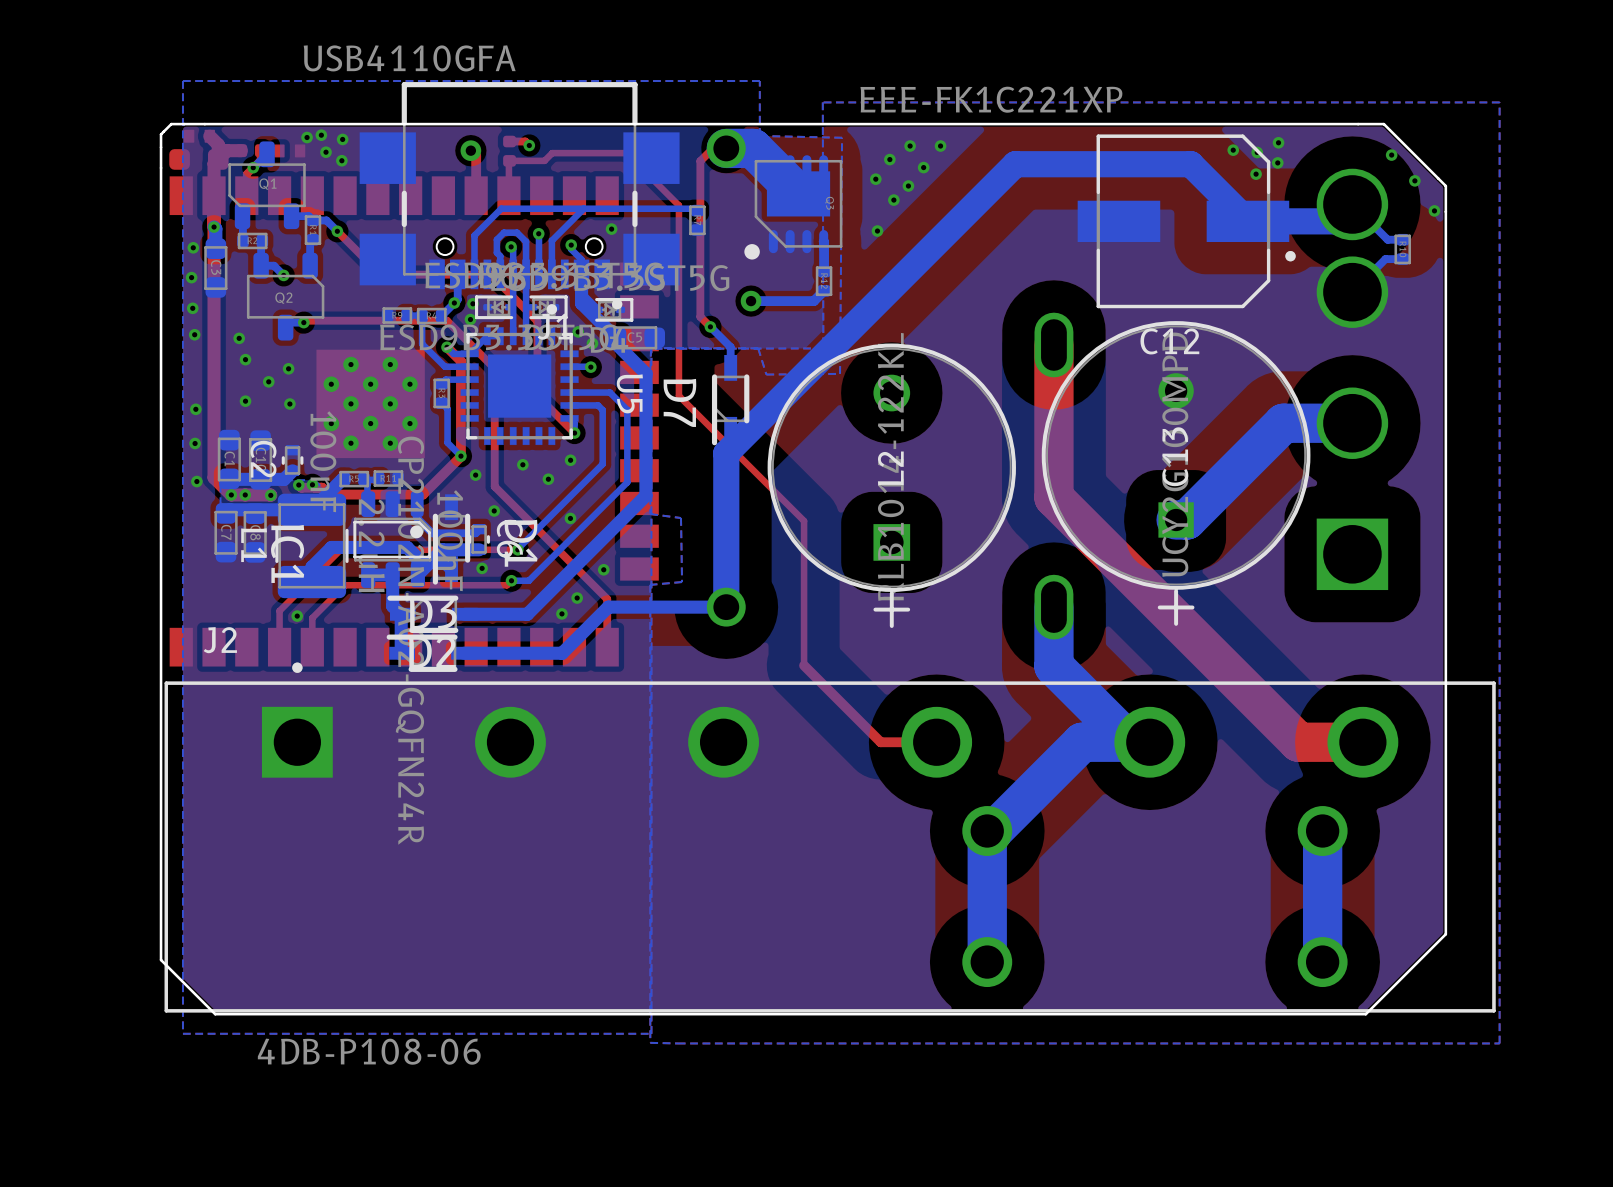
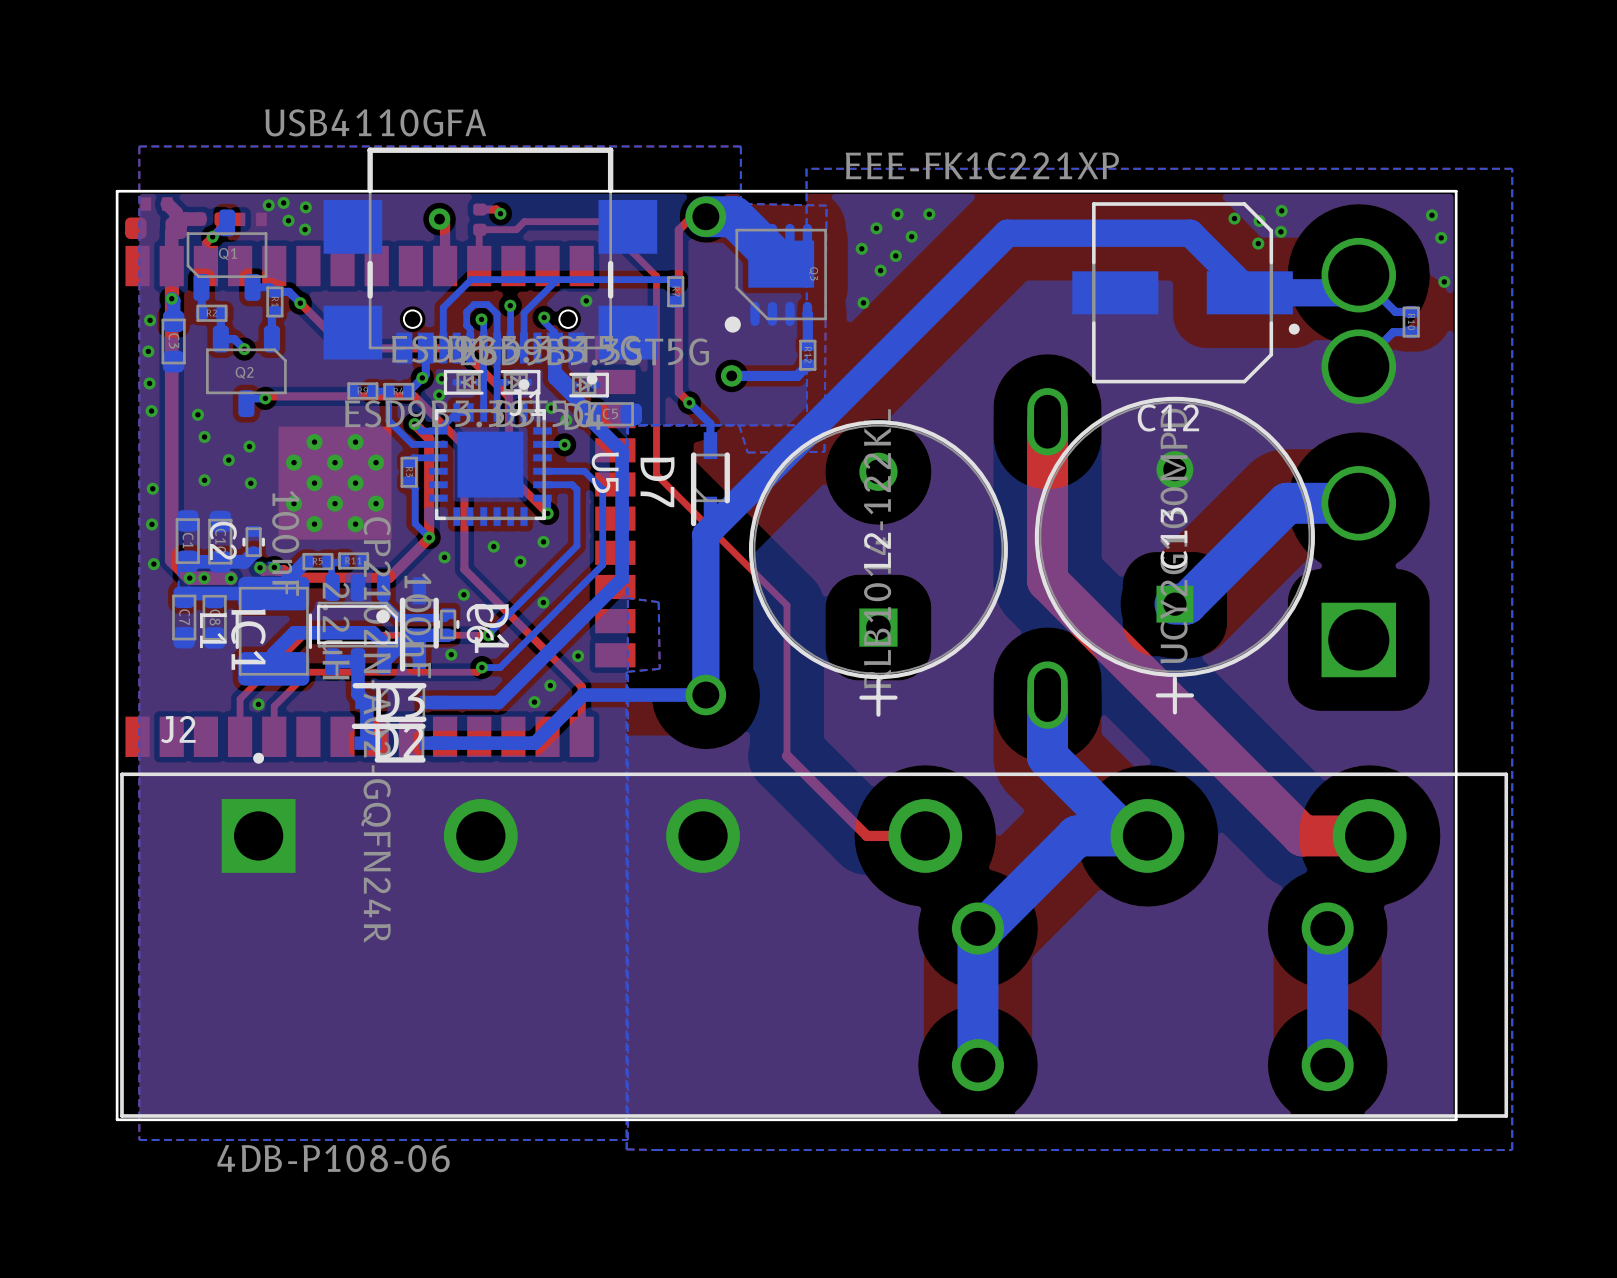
via: none -> (1431, 215)
via: (1391, 155) -> none
via: none -> (1441, 237)
via: (1414, 180) -> none
board edge: (1445, 186) (1383, 124) (171, 124) (161, 134) (161, 960) (215, 1014) (1365, 1014) (1445, 934) -> (1456, 255) (1456, 191) (117, 191) (117, 1119) (1456, 1119) (1456, 1036)

